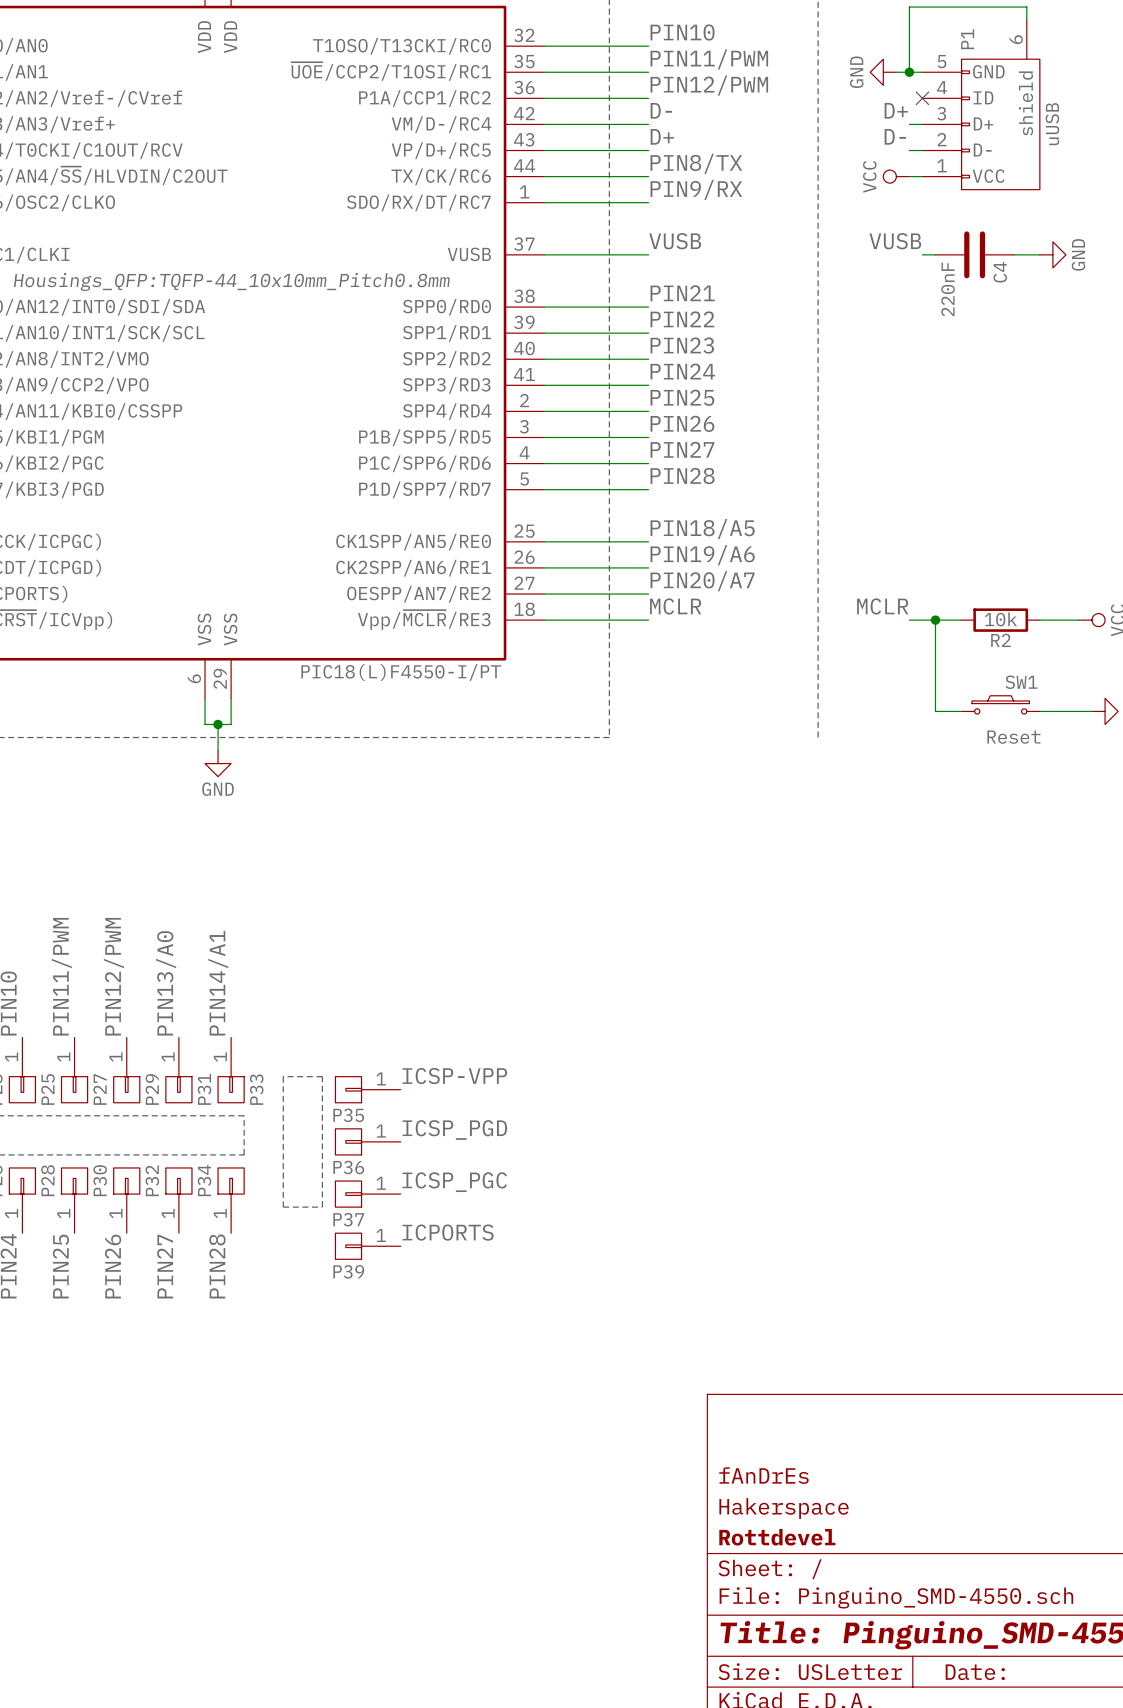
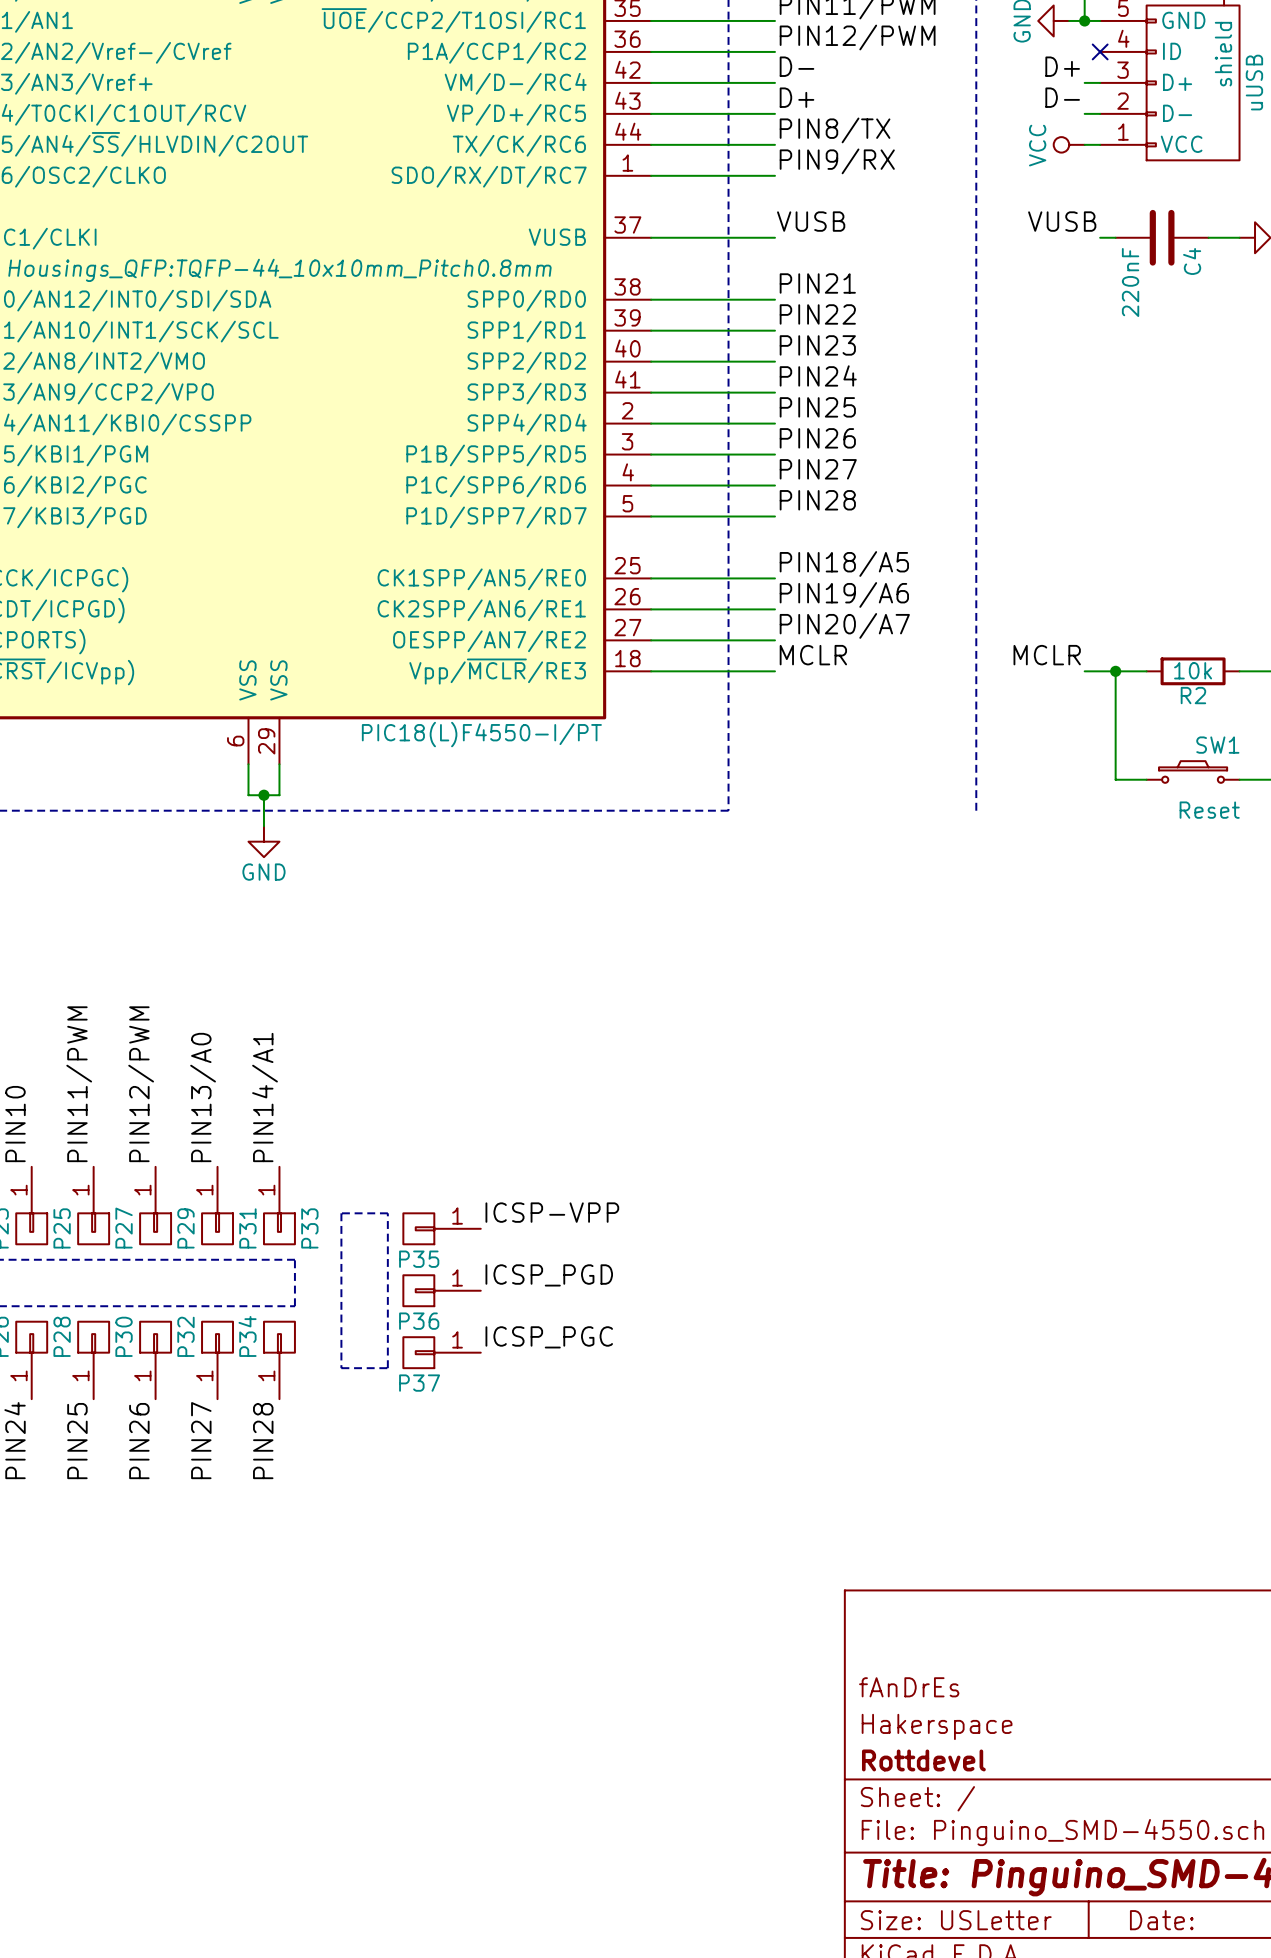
label: ICPORTS (448, 1232) -> none
P39: (368, 1246) -> none

